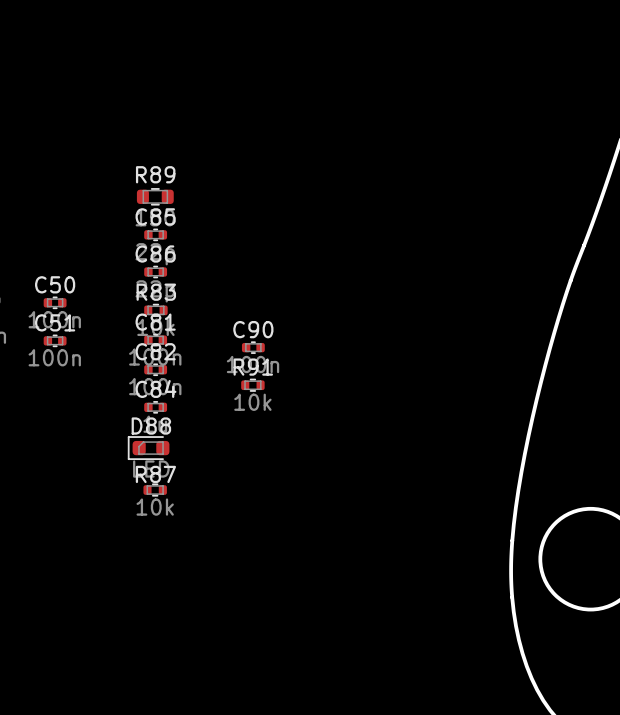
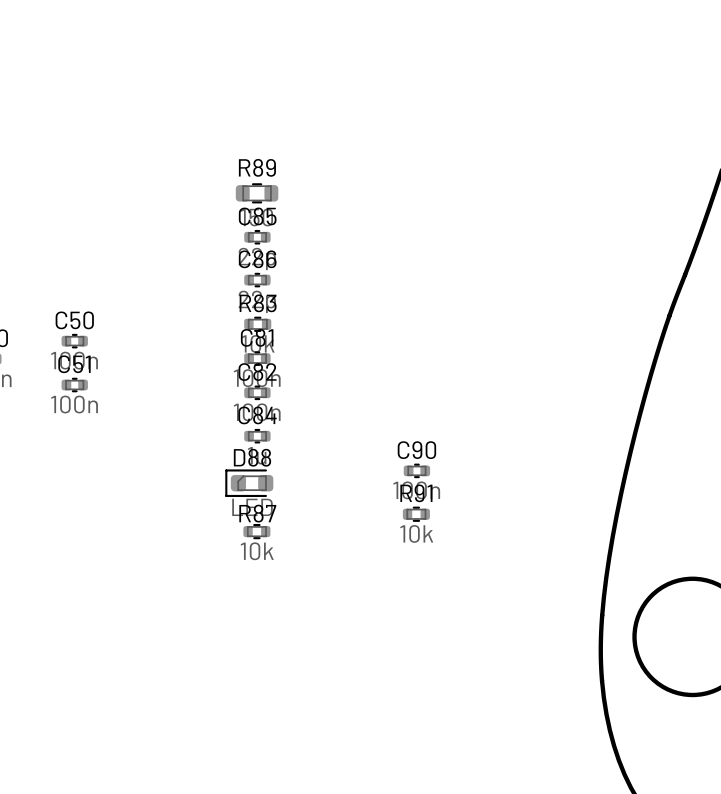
R89 position: (155, 196) -> (257, 193)
C85 position: (155, 234) -> (257, 237)
C86 position: (155, 272) -> (257, 280)
R83 position: (155, 310) -> (257, 324)
C81 position: (155, 340) -> (257, 358)
C90 position: (253, 347) -> (416, 470)
C82 position: (155, 369) -> (257, 392)
R91 position: (252, 385) -> (416, 514)
C84 position: (155, 407) -> (257, 436)
D88 position: (148, 448) -> (249, 483)
R87 position: (155, 490) -> (256, 531)

